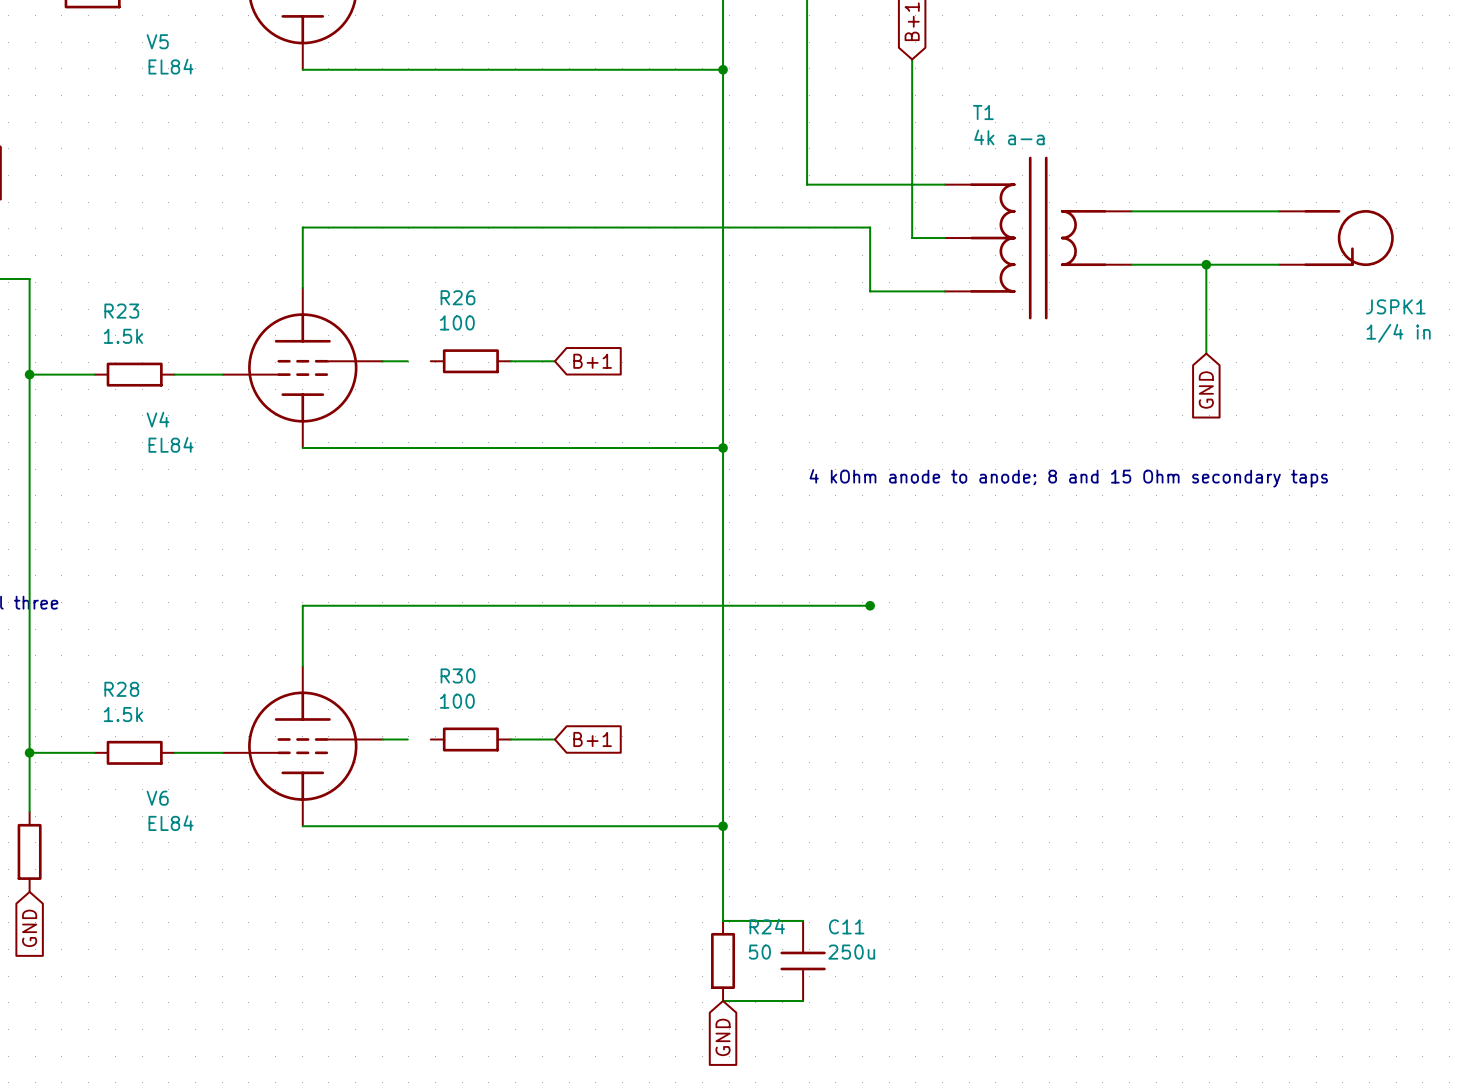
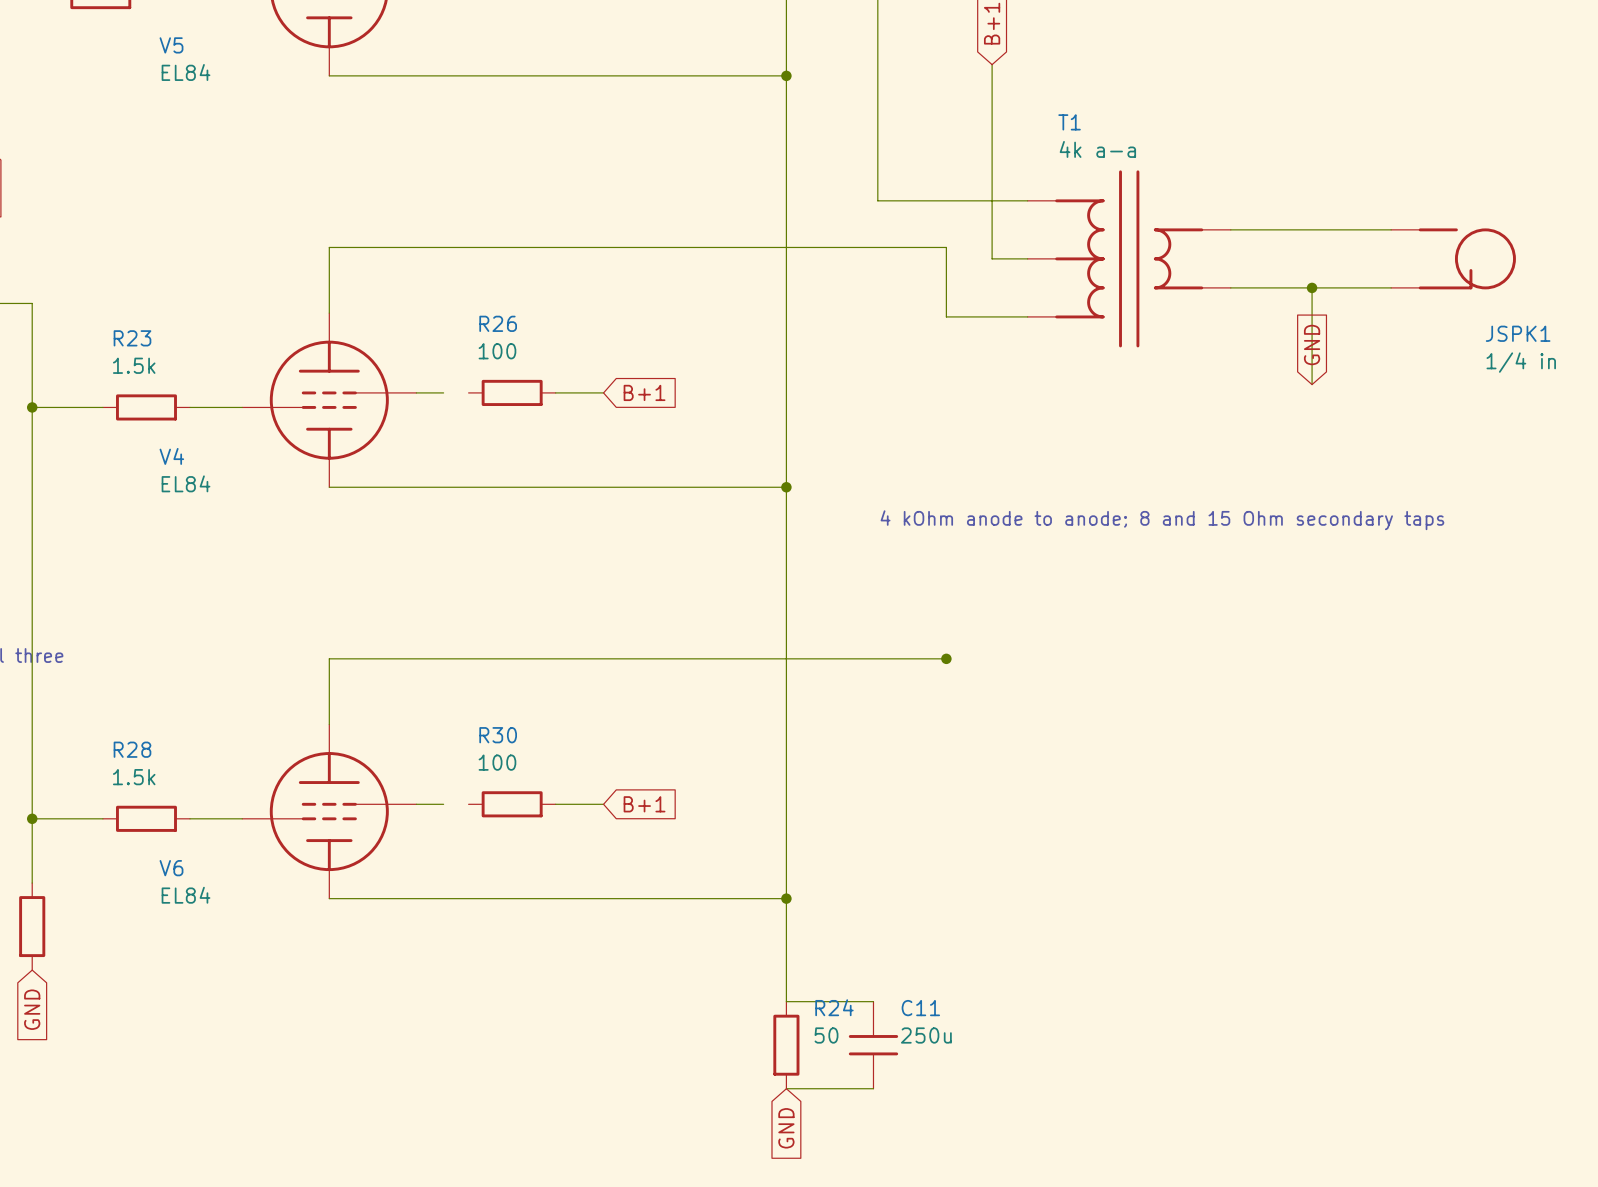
global label rotation: 0° (1206, 390) -> 180° (1312, 345)

